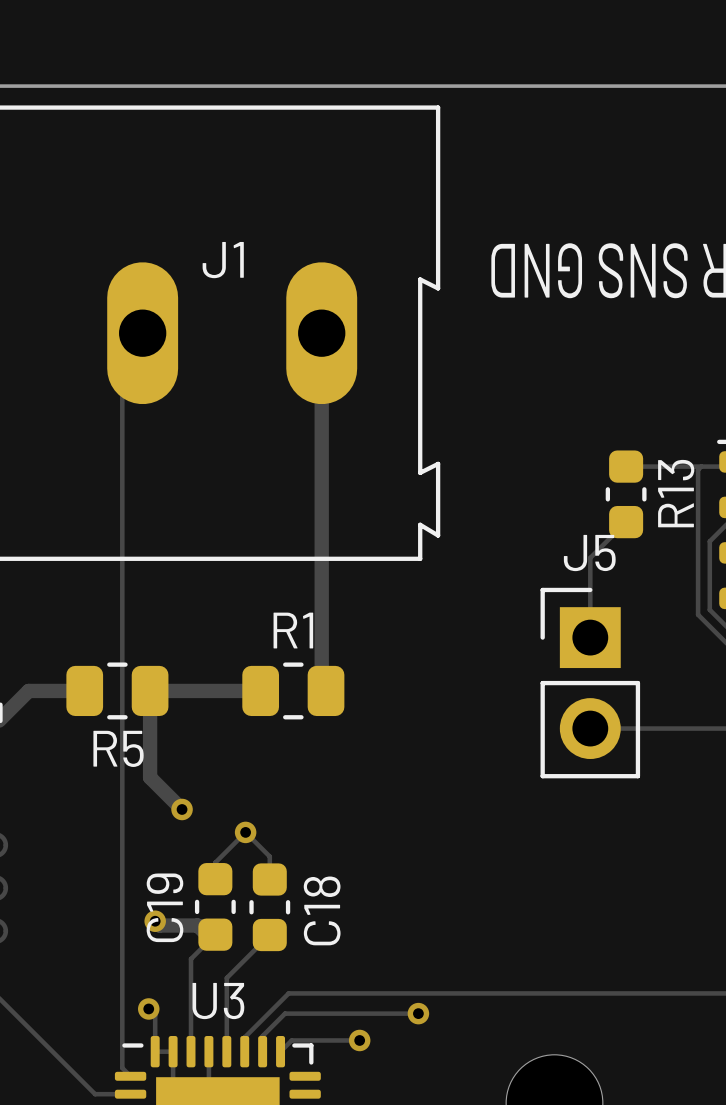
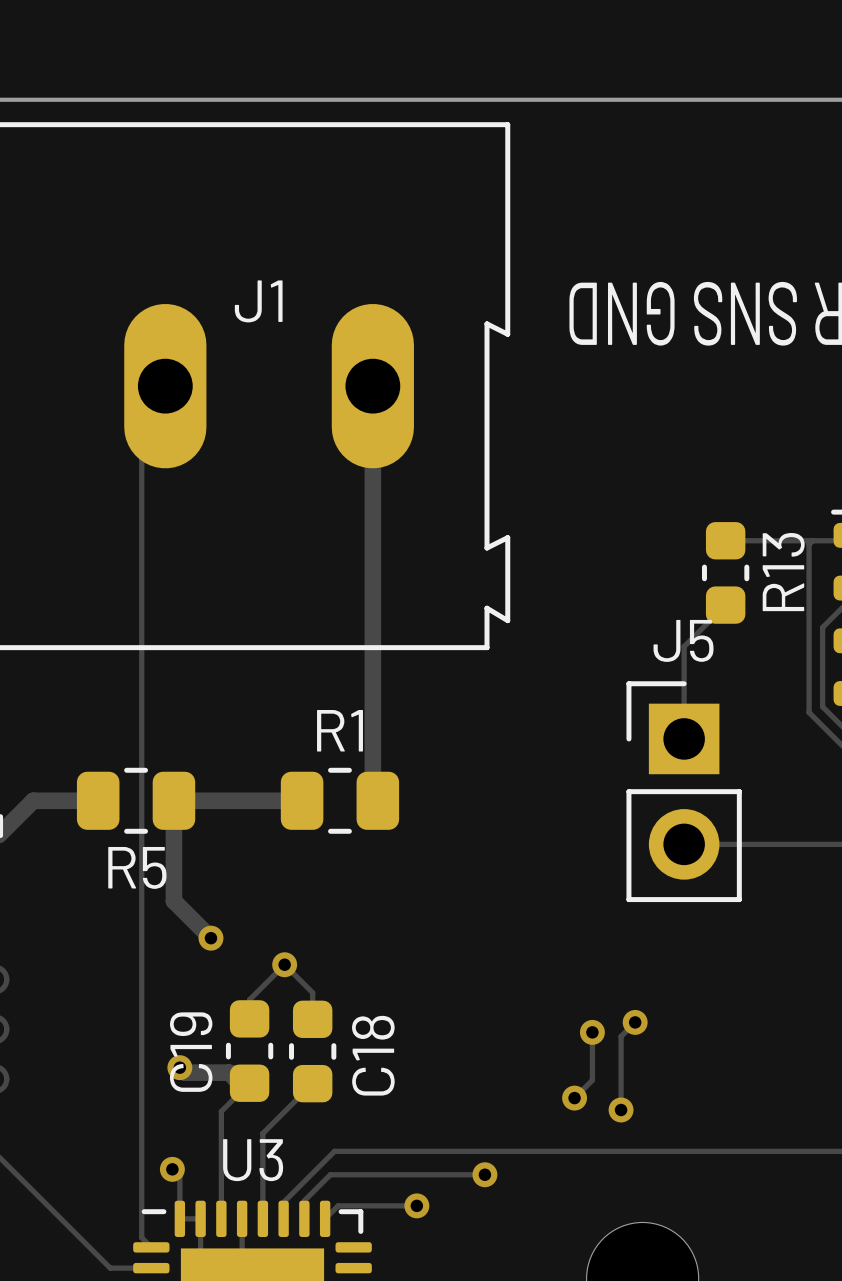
track: none -> (635, 1022) (621, 1036) (621, 1110)
via: none -> (635, 1022)
track: none -> (592, 1032) (592, 1080) (574, 1098)
via: none -> (592, 1032)
via: none -> (574, 1098)
via: none -> (621, 1110)

